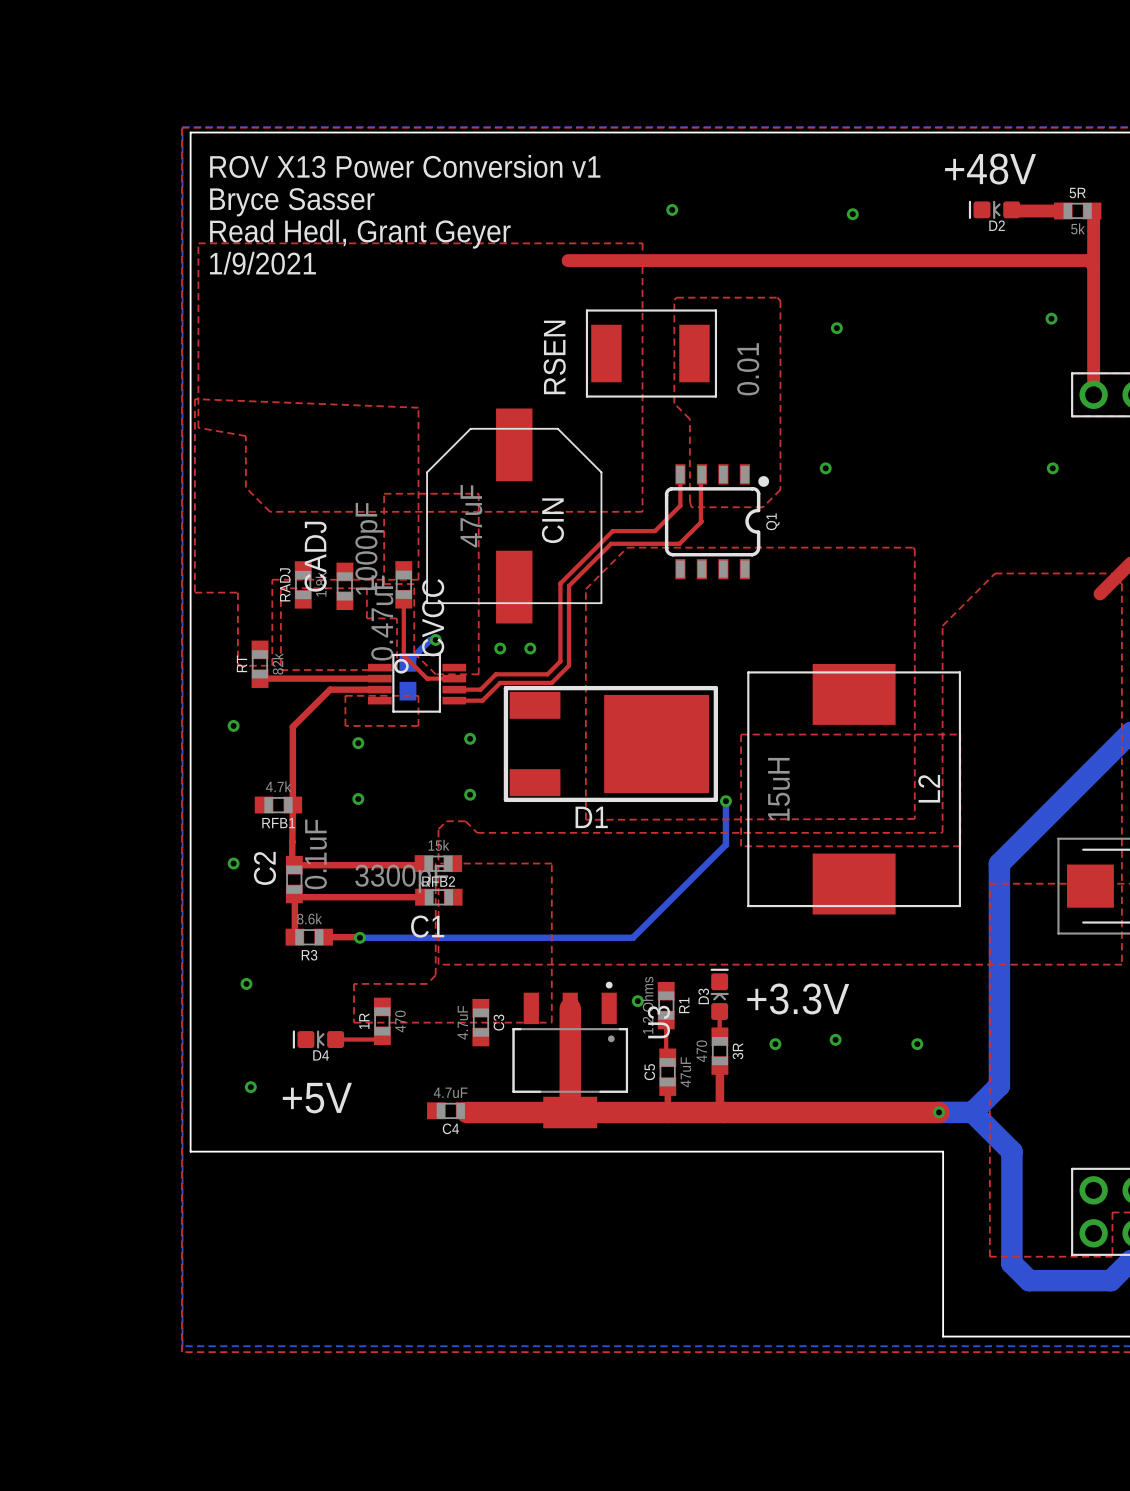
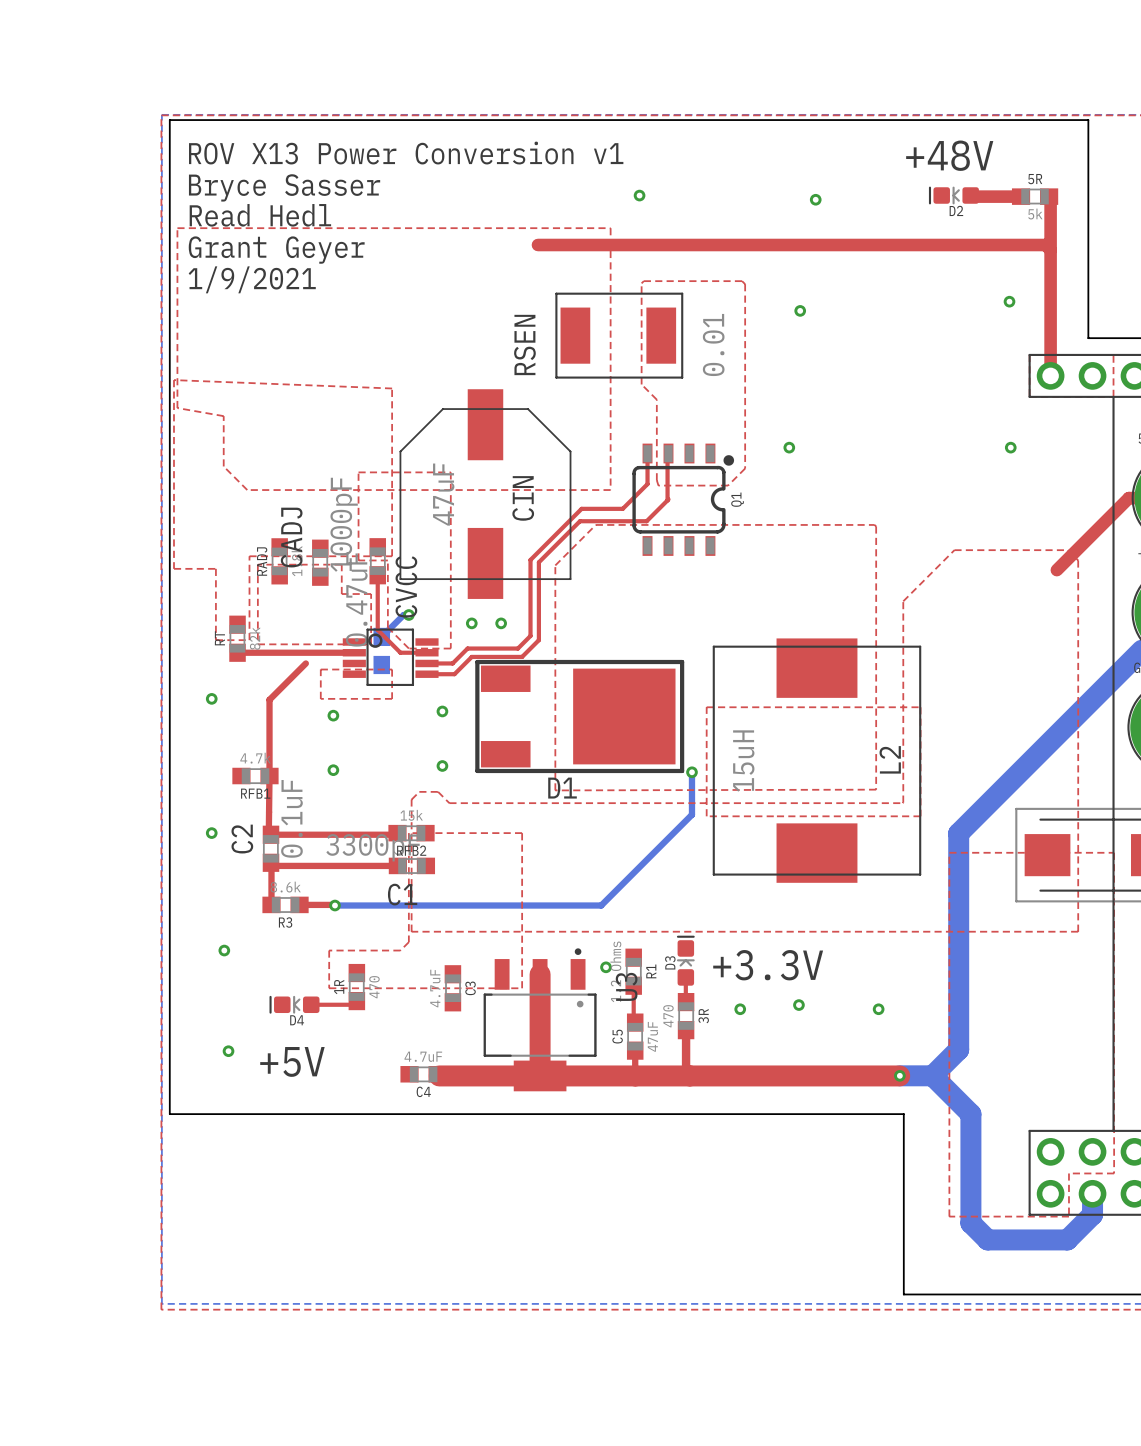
text: Read Hedl, Grant Geyer (360, 234) -> Read Hedl (260, 215)
text: 1/9/2021 (262, 263) -> Grant Geyer (276, 250)
text: none -> 1/9/2021 (252, 279)
top track: (330, 689) (379, 689) -> none

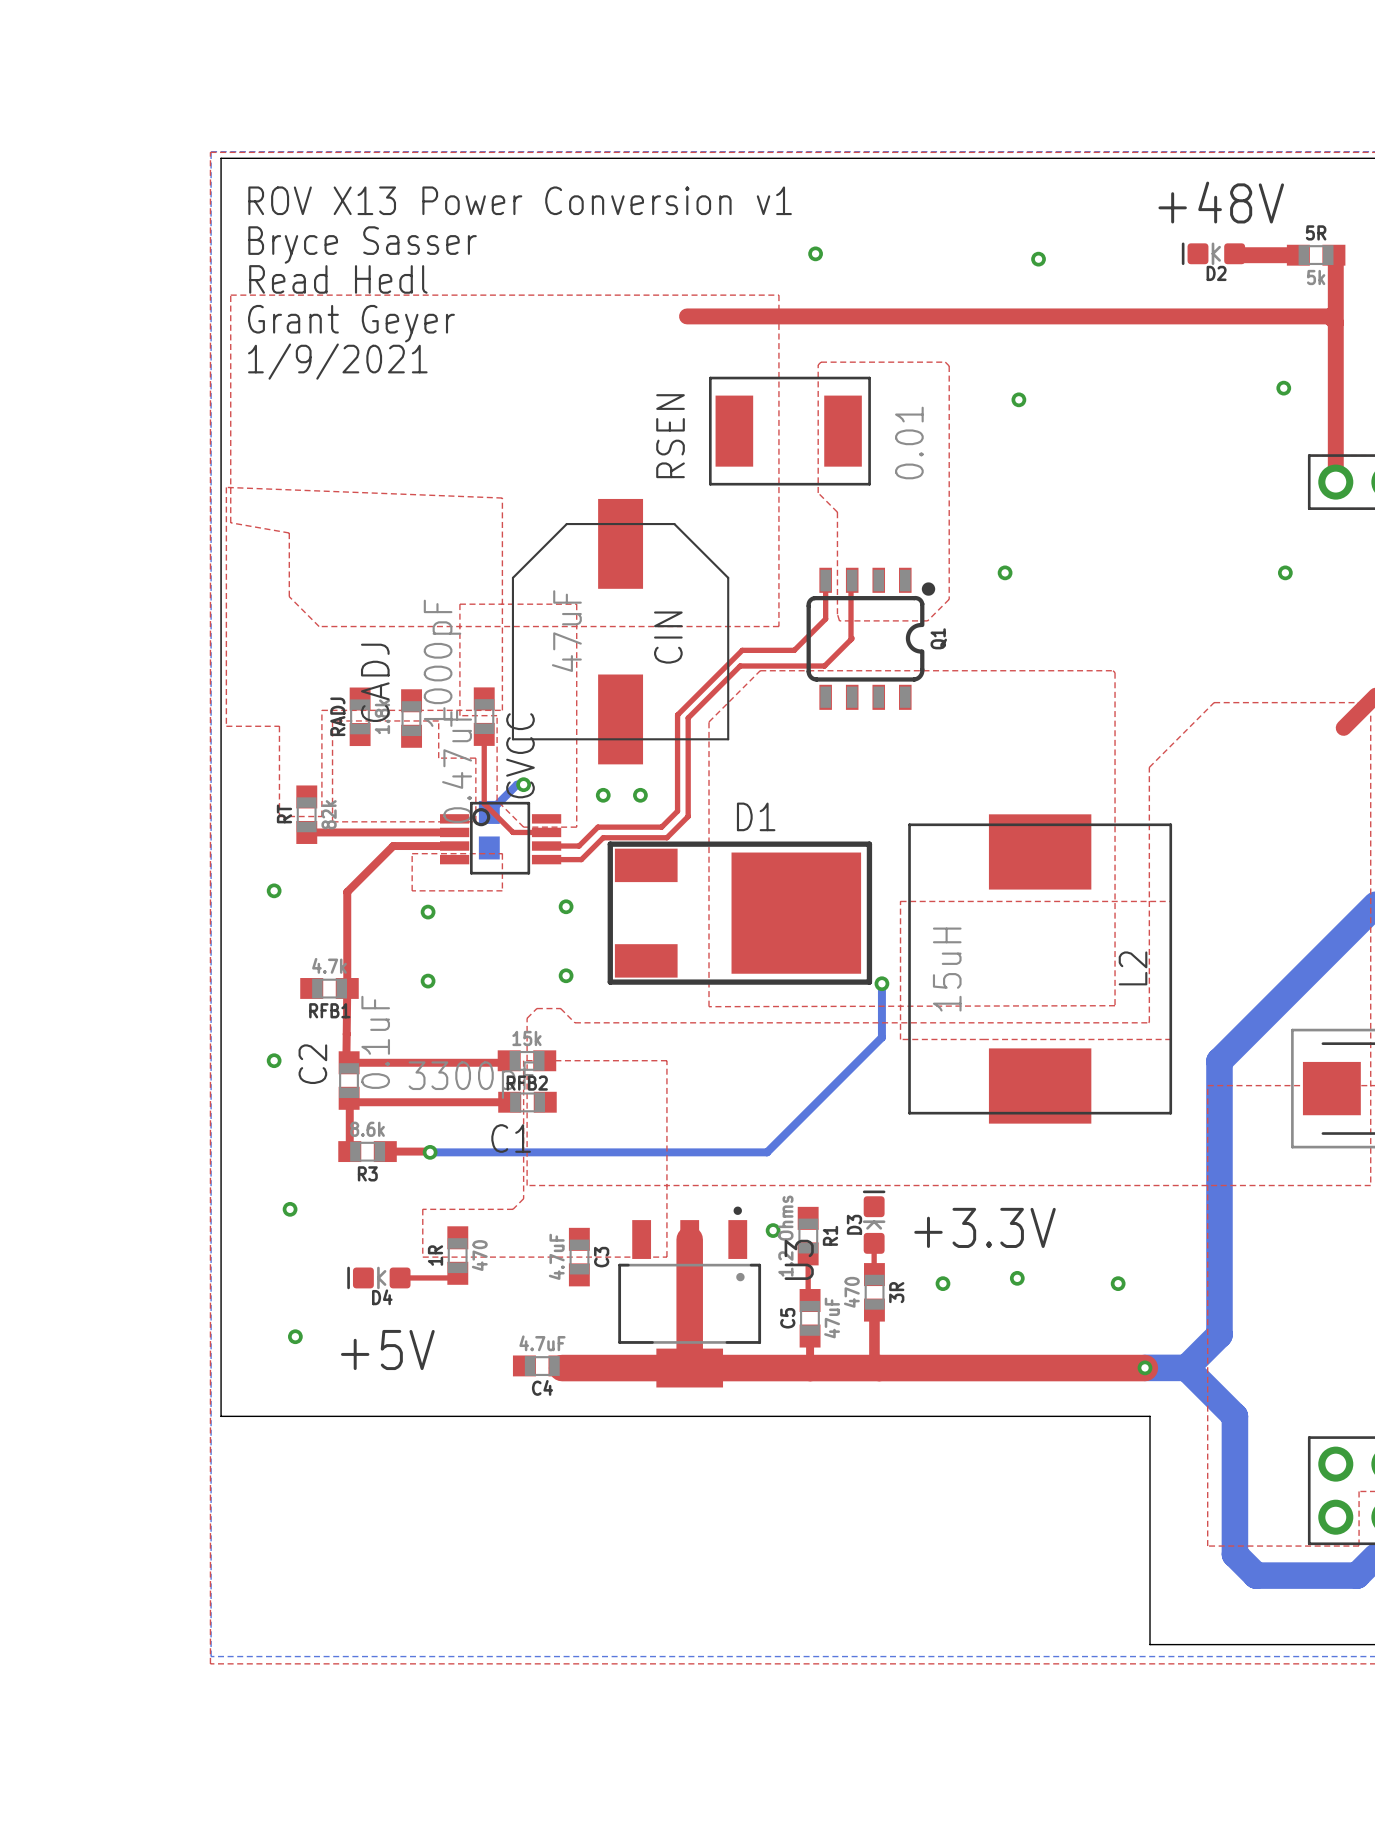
top track: none -> (393, 846) (454, 846)
D1 name position: D1 (562, 788) -> D1 (756, 816)

